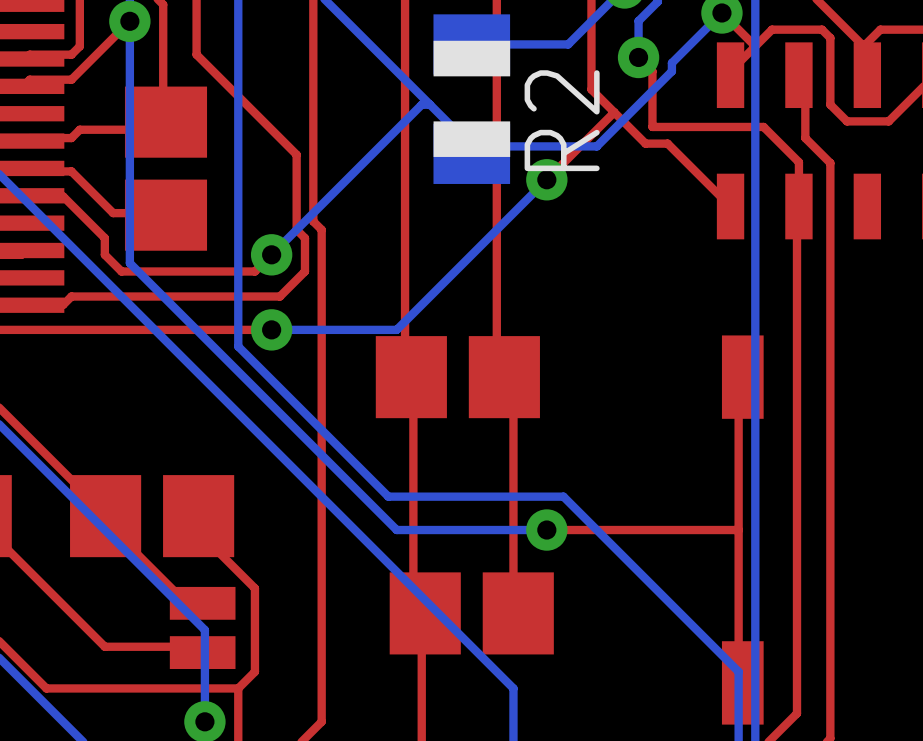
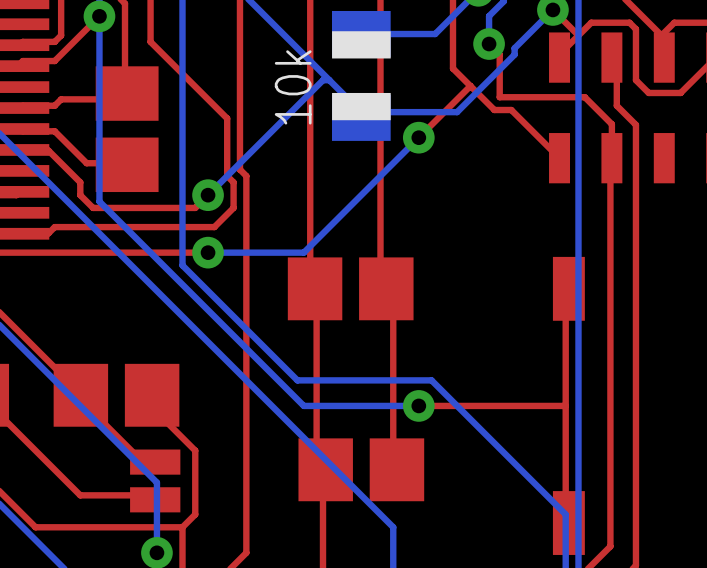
R2 value: none -> 10k (293, 87)
R2 name: R2 (562, 120) -> none

